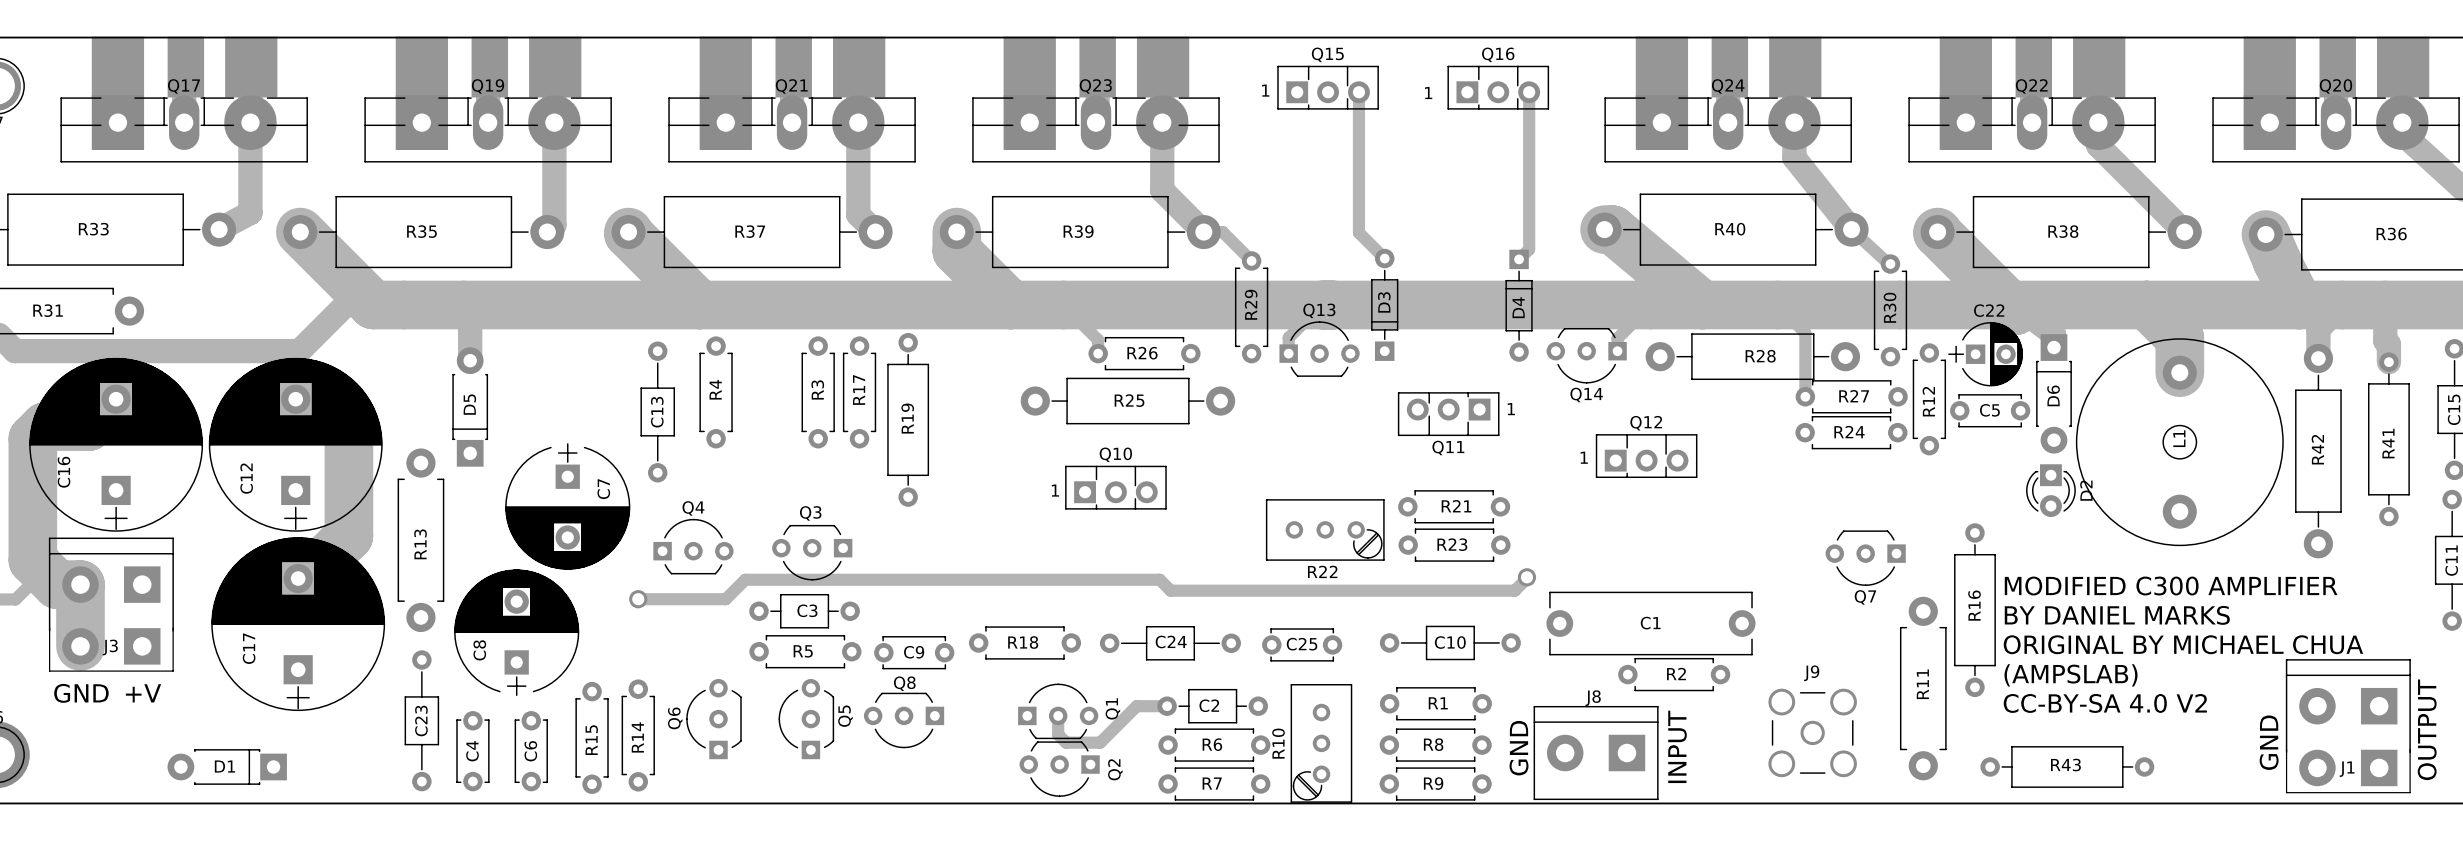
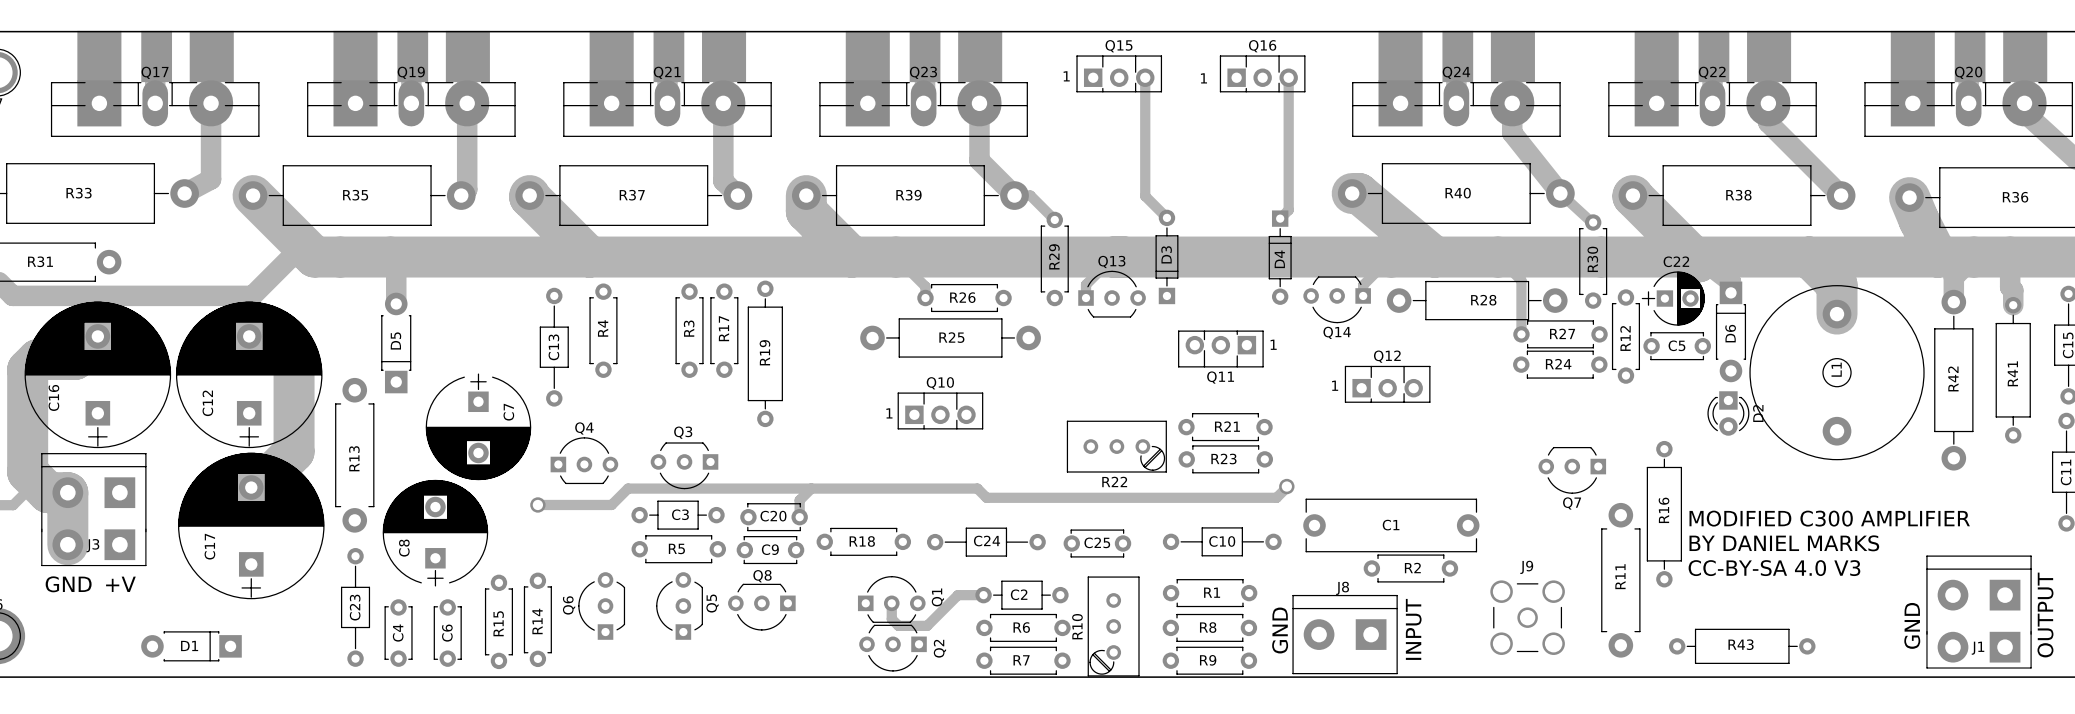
track: none -> (811, 488) (799, 500) (799, 517)
text: MODIFIED C300 AMPLIFIER (2171, 586) -> none
C20: none -> (774, 517)
text: BY DANIEL MARKS (2117, 615) -> MODIFIED C300 AMPLIFIER (1829, 518)
text: ORIGINAL BY MICHAEL CHUA (2183, 644) -> BY DANIEL MARKS (1784, 543)
text: (AMPSLAB) (2071, 675) -> CC-BY-SA 4.0 V3 (1774, 568)
text: CC-BY-SA 4.0 V2 (2105, 703) -> none

